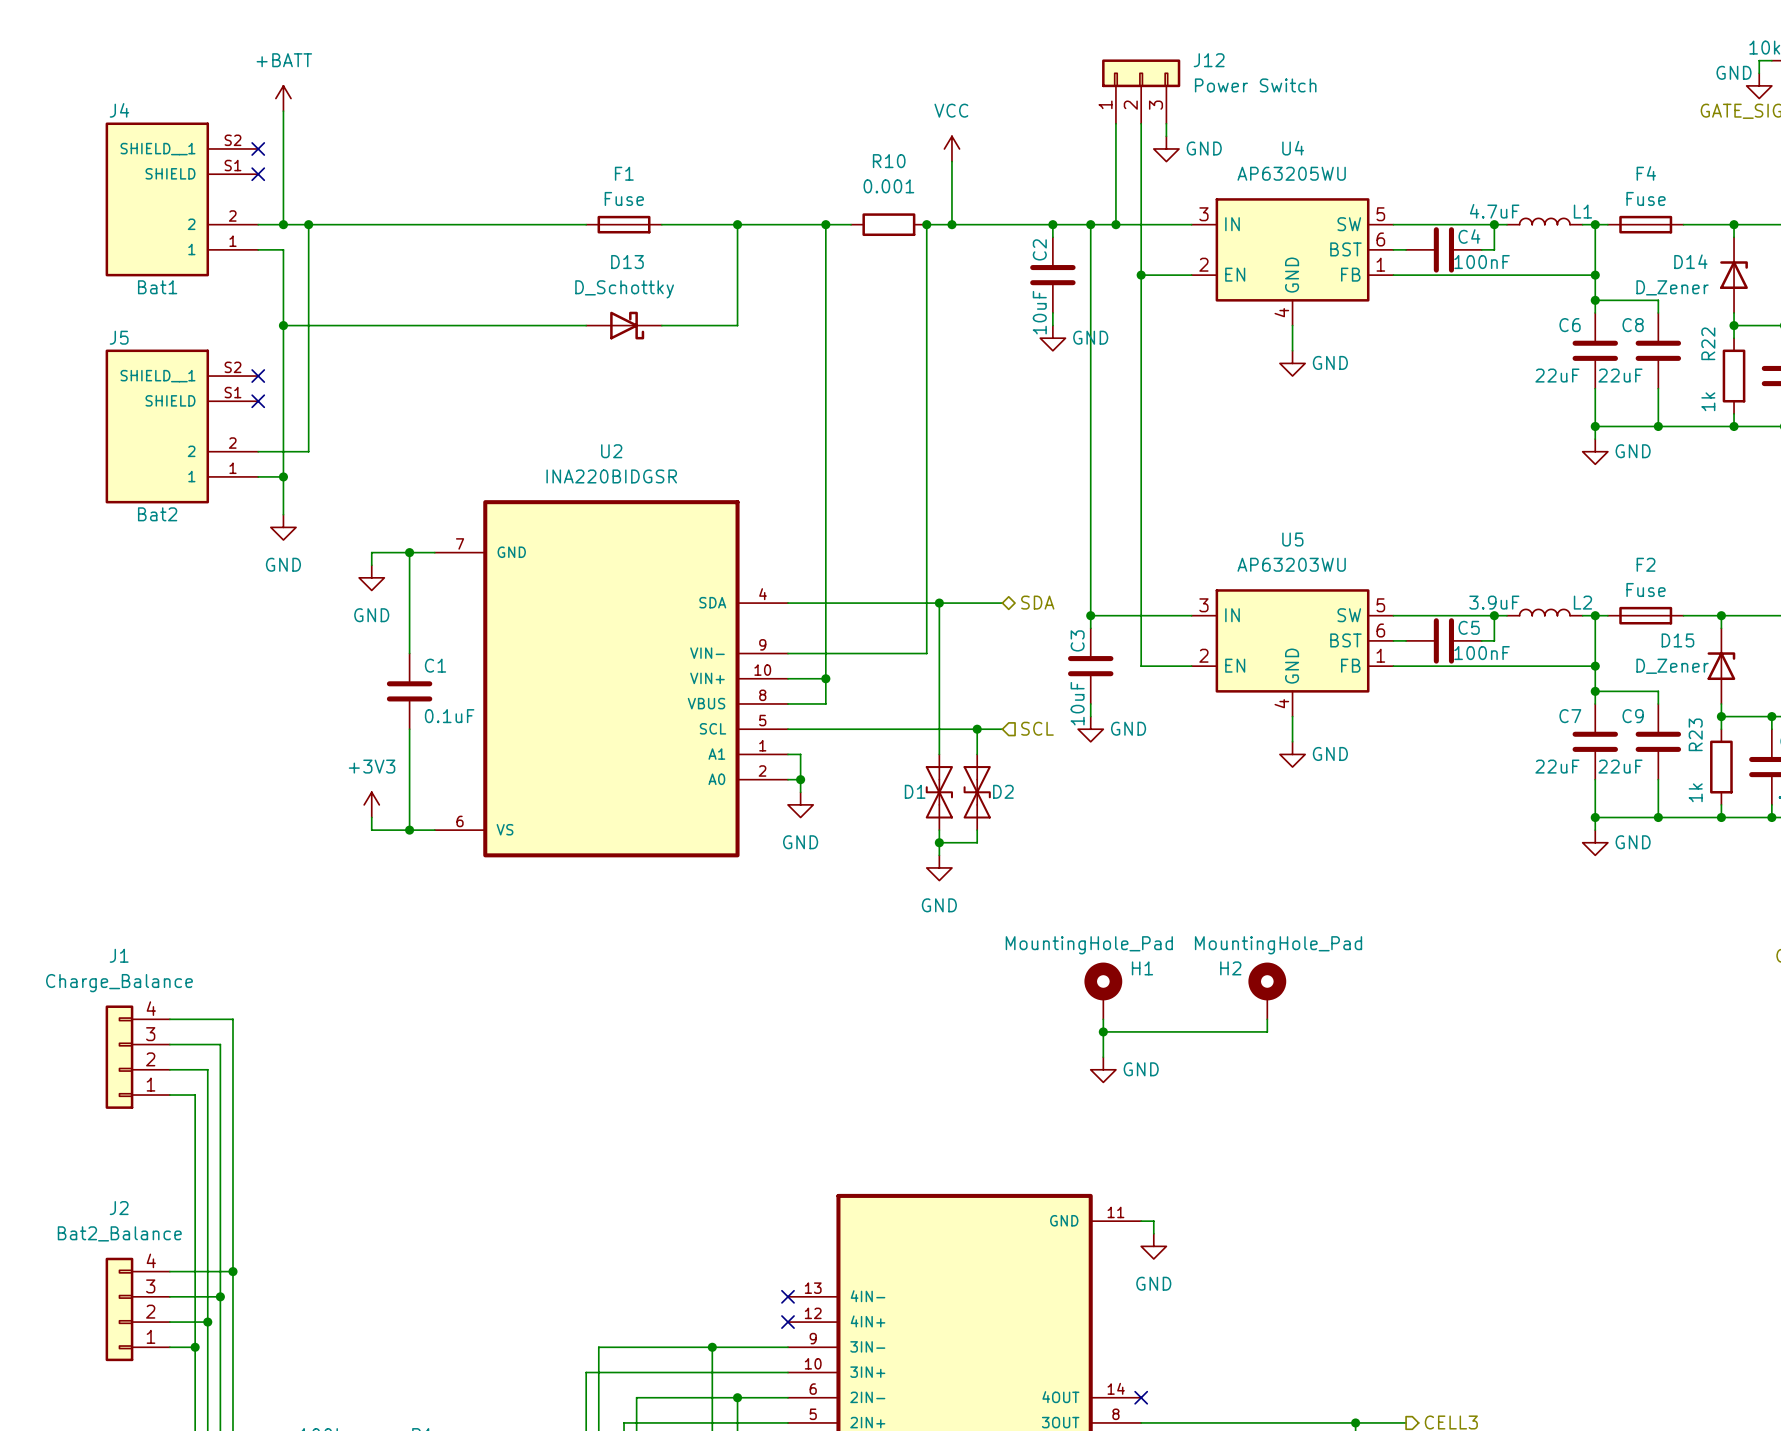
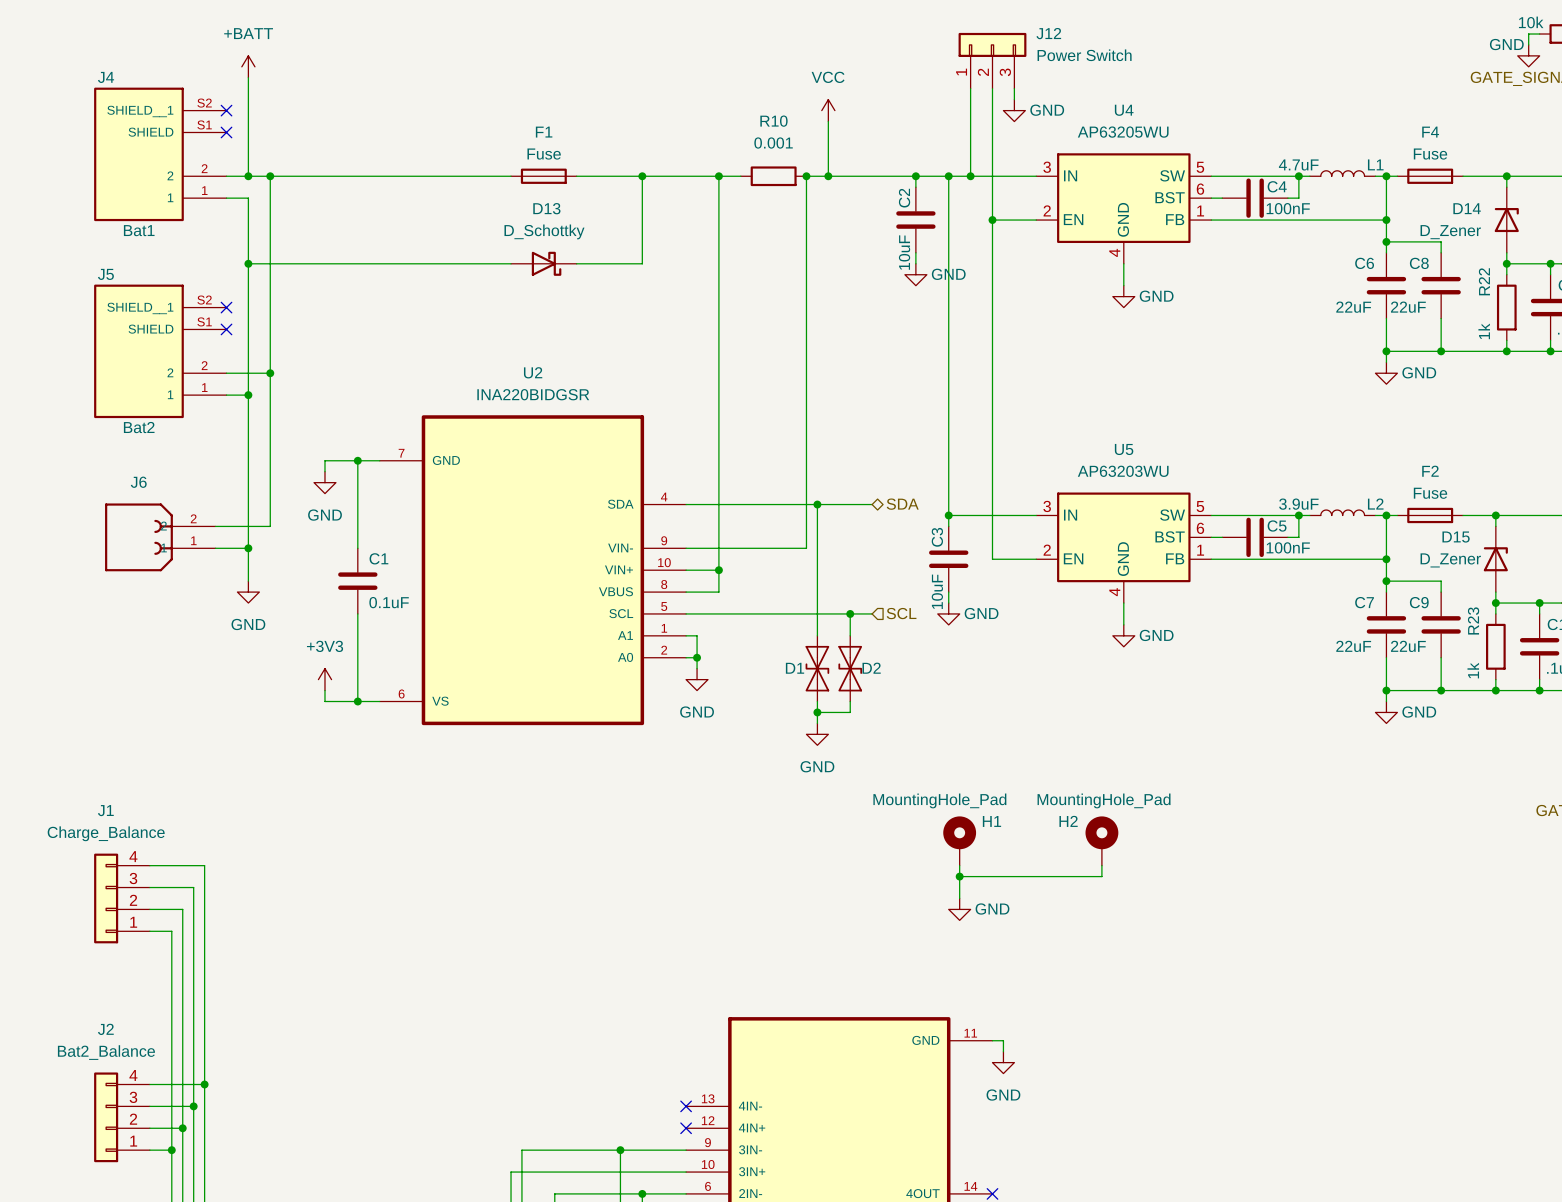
wire: none -> (270, 373) (270, 526) (215, 526)
junction: none -> (270, 373)
wire: none -> (248, 427) (248, 581)
power symbol position: GND (283, 527) -> GND (248, 592)
J6: none -> (160, 537)
wire: none -> (215, 548) (248, 548)
junction: none -> (248, 548)

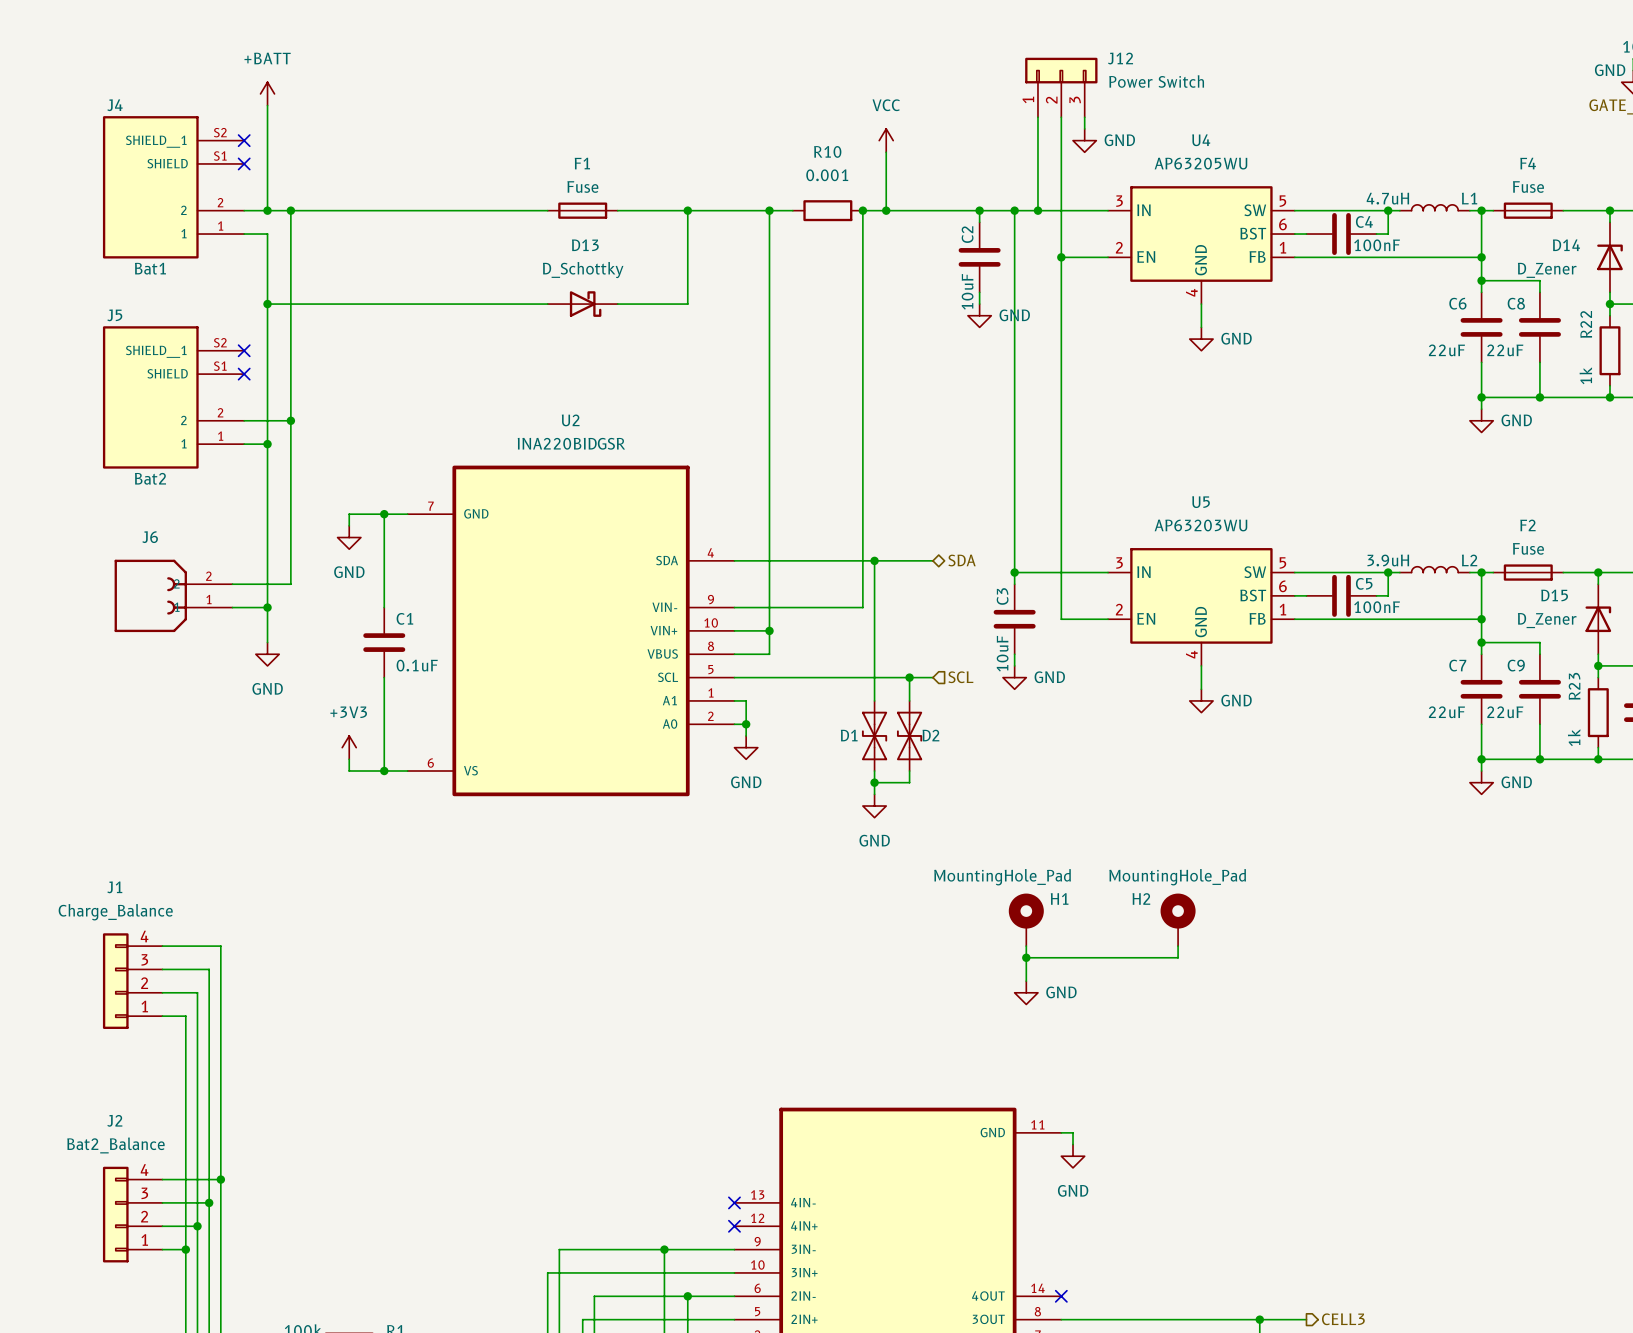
L1 value: 4.7uF (1298, 164) -> 4.7uH (1387, 198)
L2 value: 3.9uF (1298, 504) -> 3.9uH (1388, 560)

